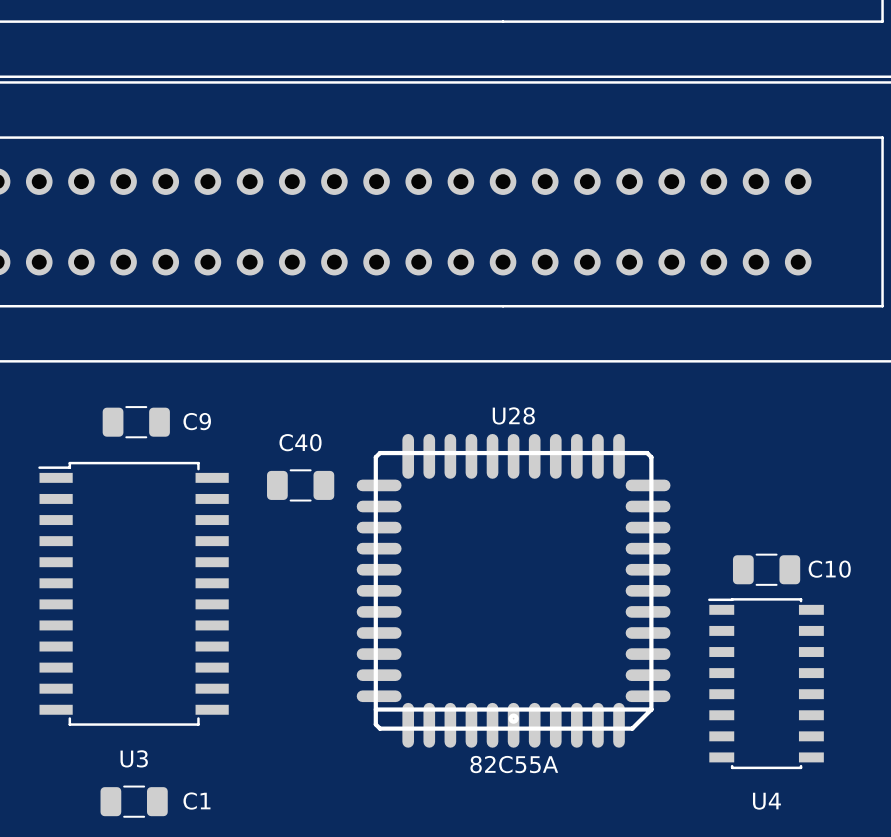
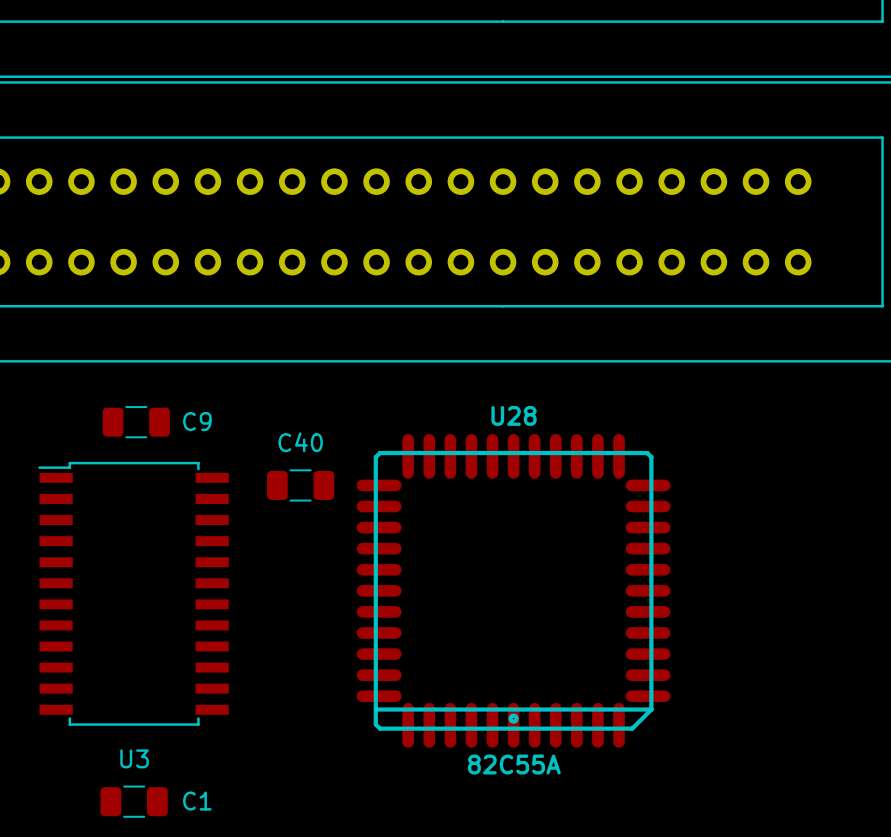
C10: (766, 569) -> none
U4: (765, 683) -> none

